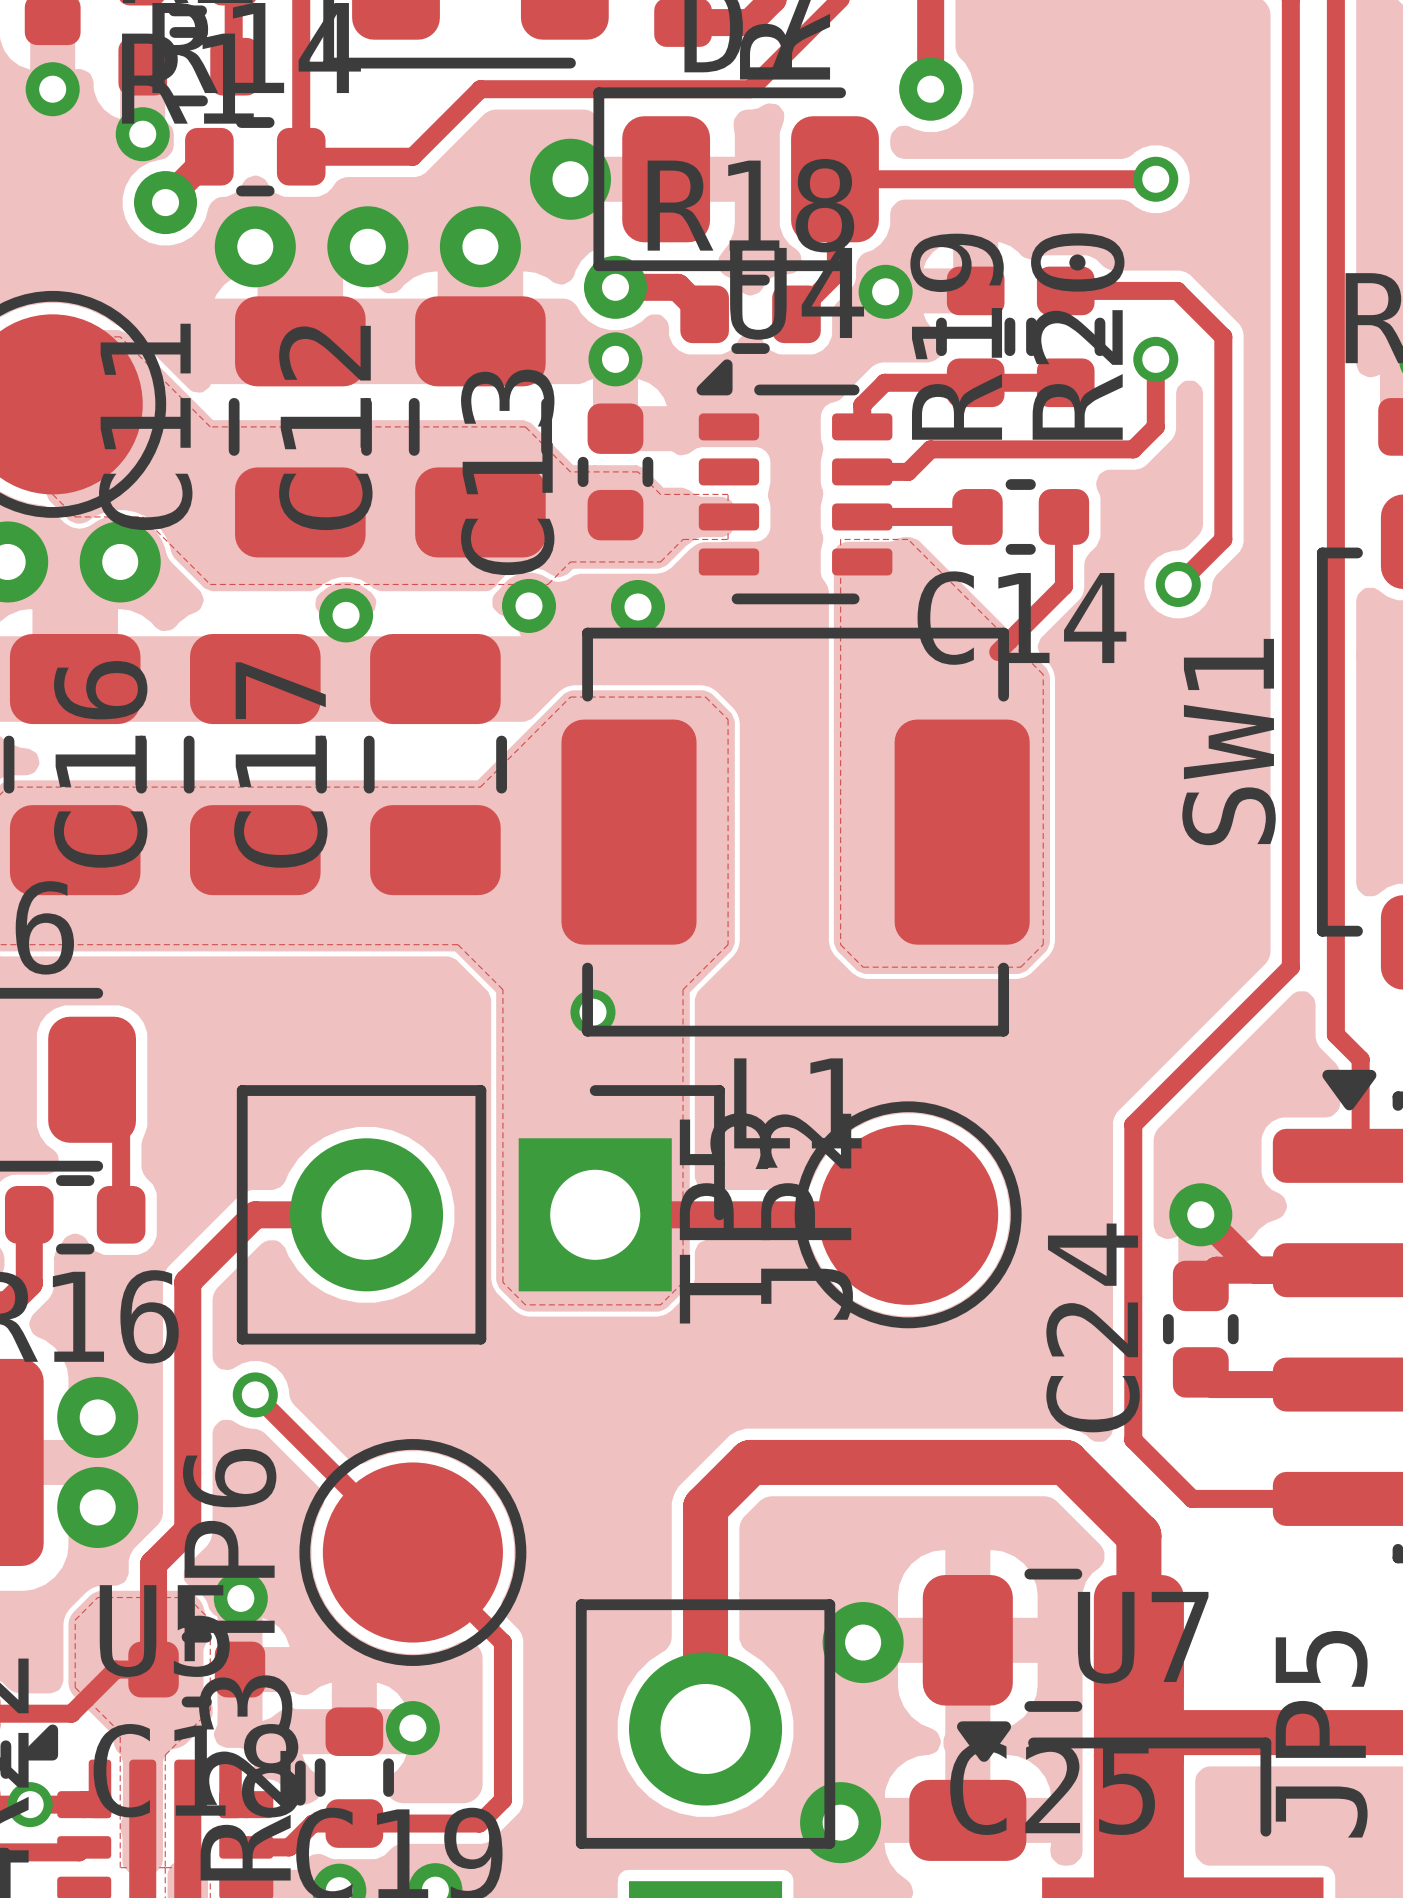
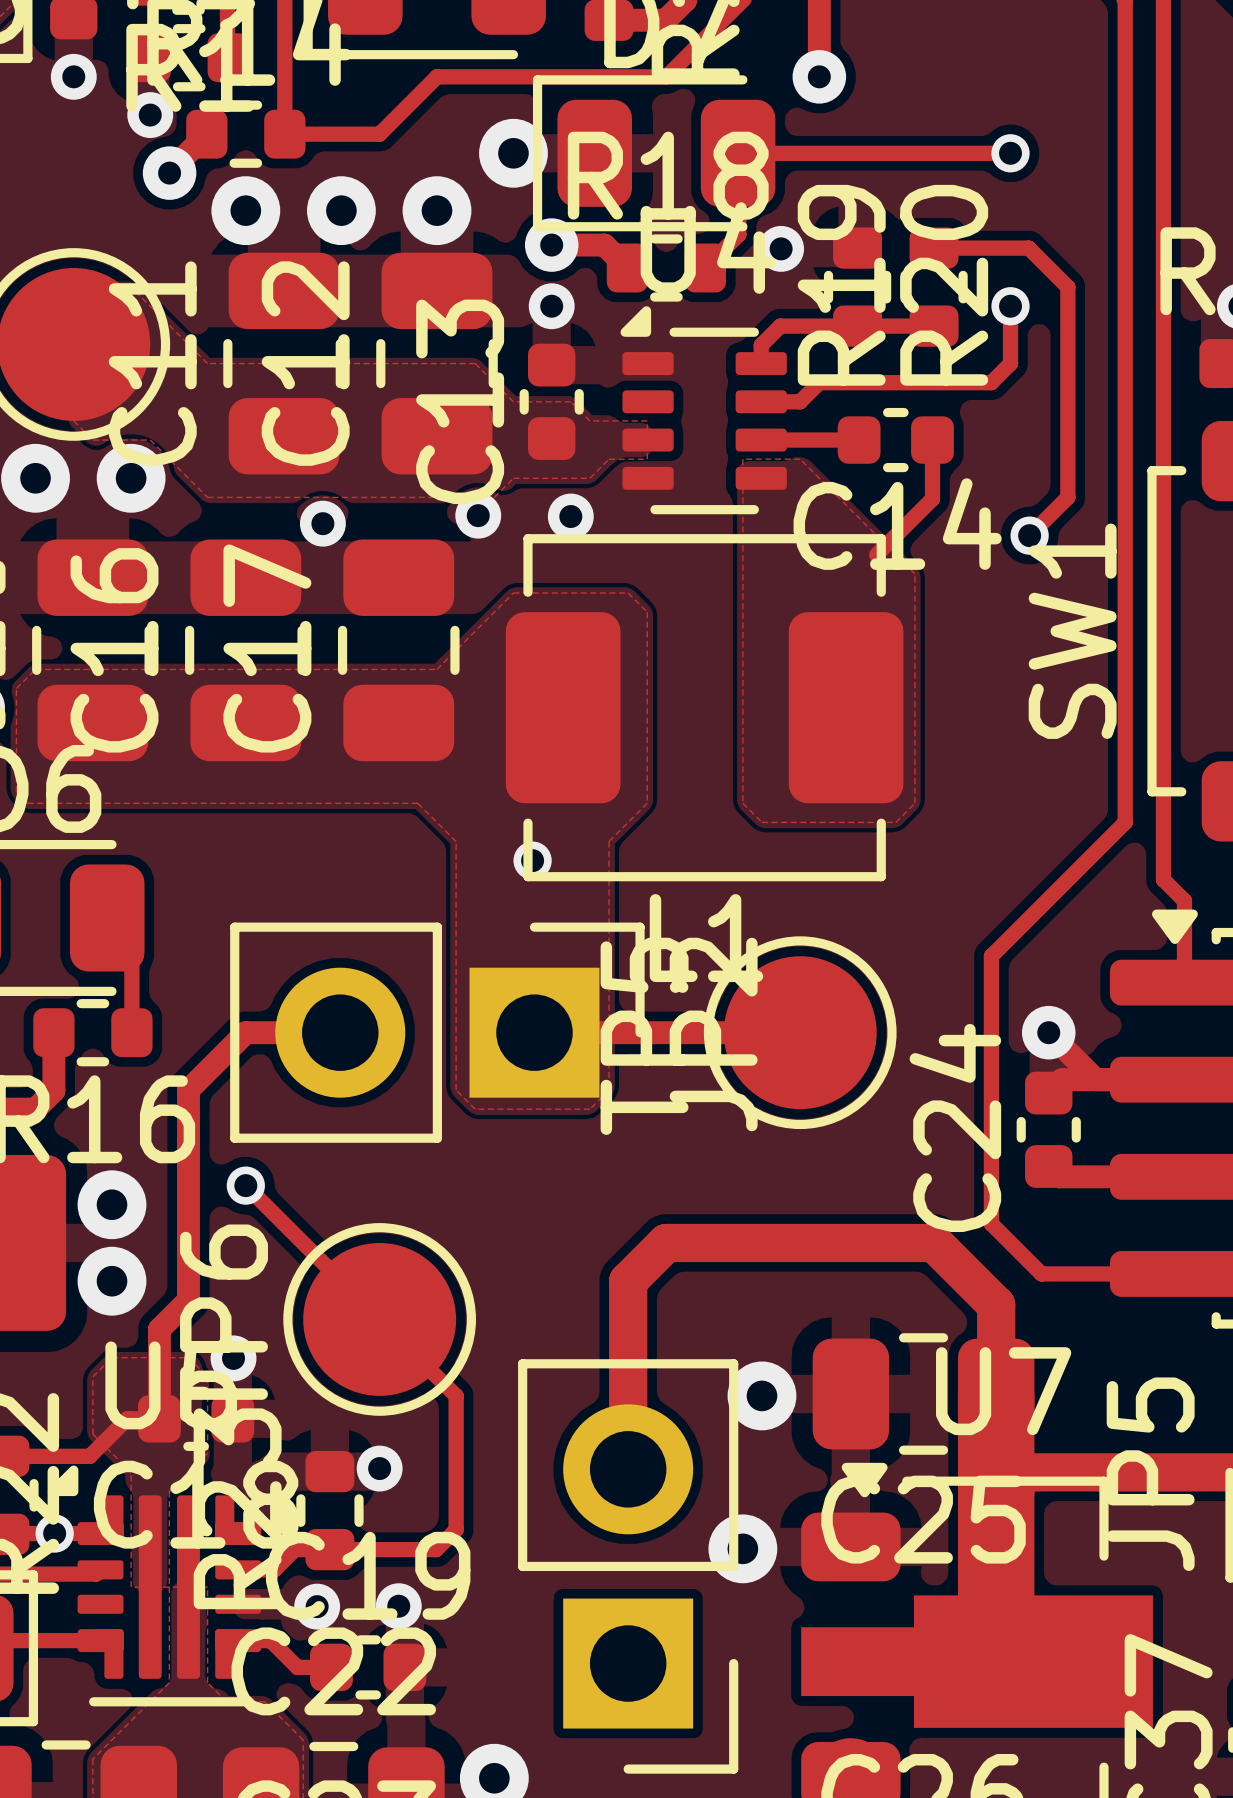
track: (1223, 539) (1178, 584) -> (1067, 459) (1067, 497) (1029, 535)
via position: (1178, 584) -> (1029, 535)

